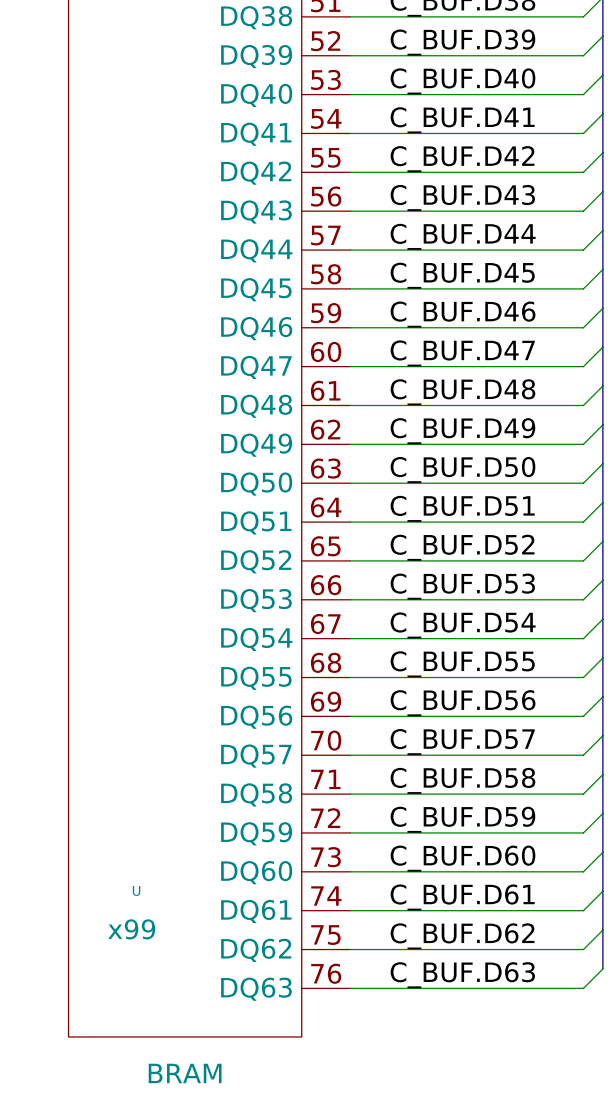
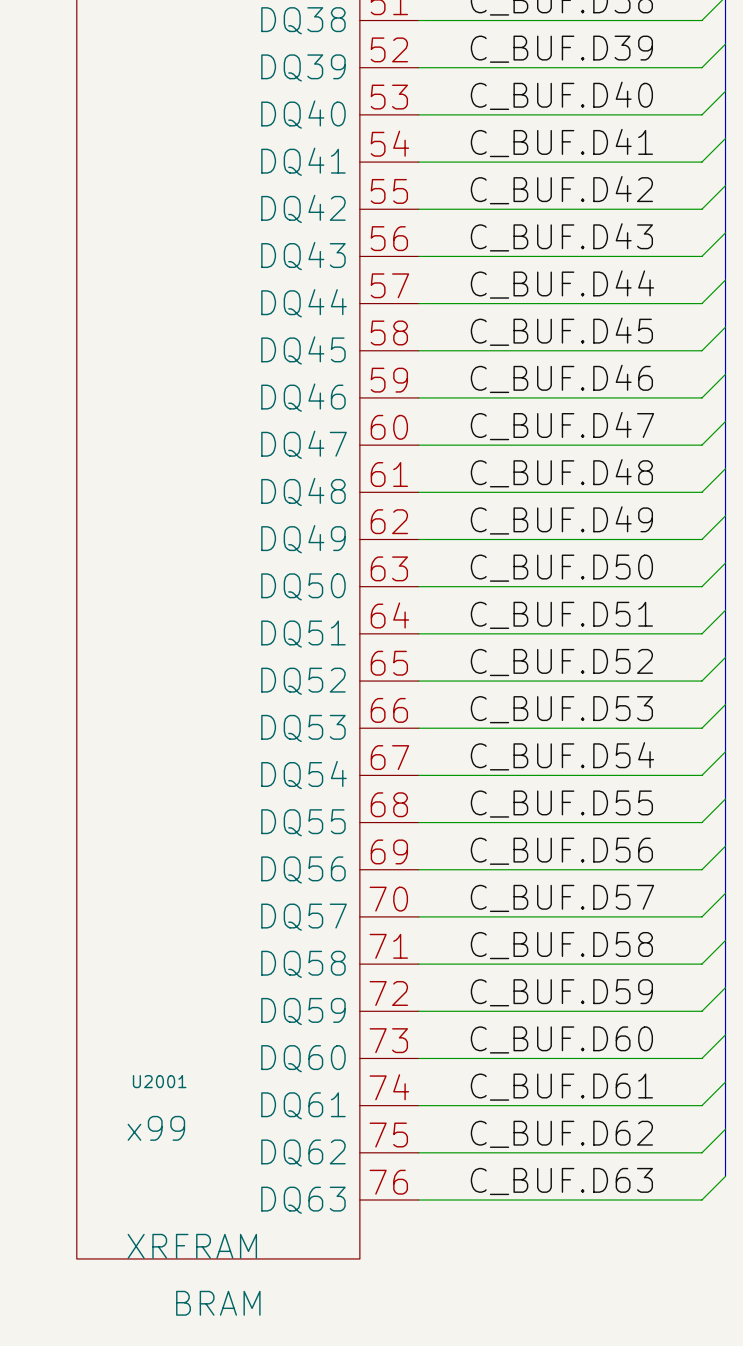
U name: U (136, 890) -> U2001 (159, 1081)
U value: none -> XRFRAM (192, 1246)

